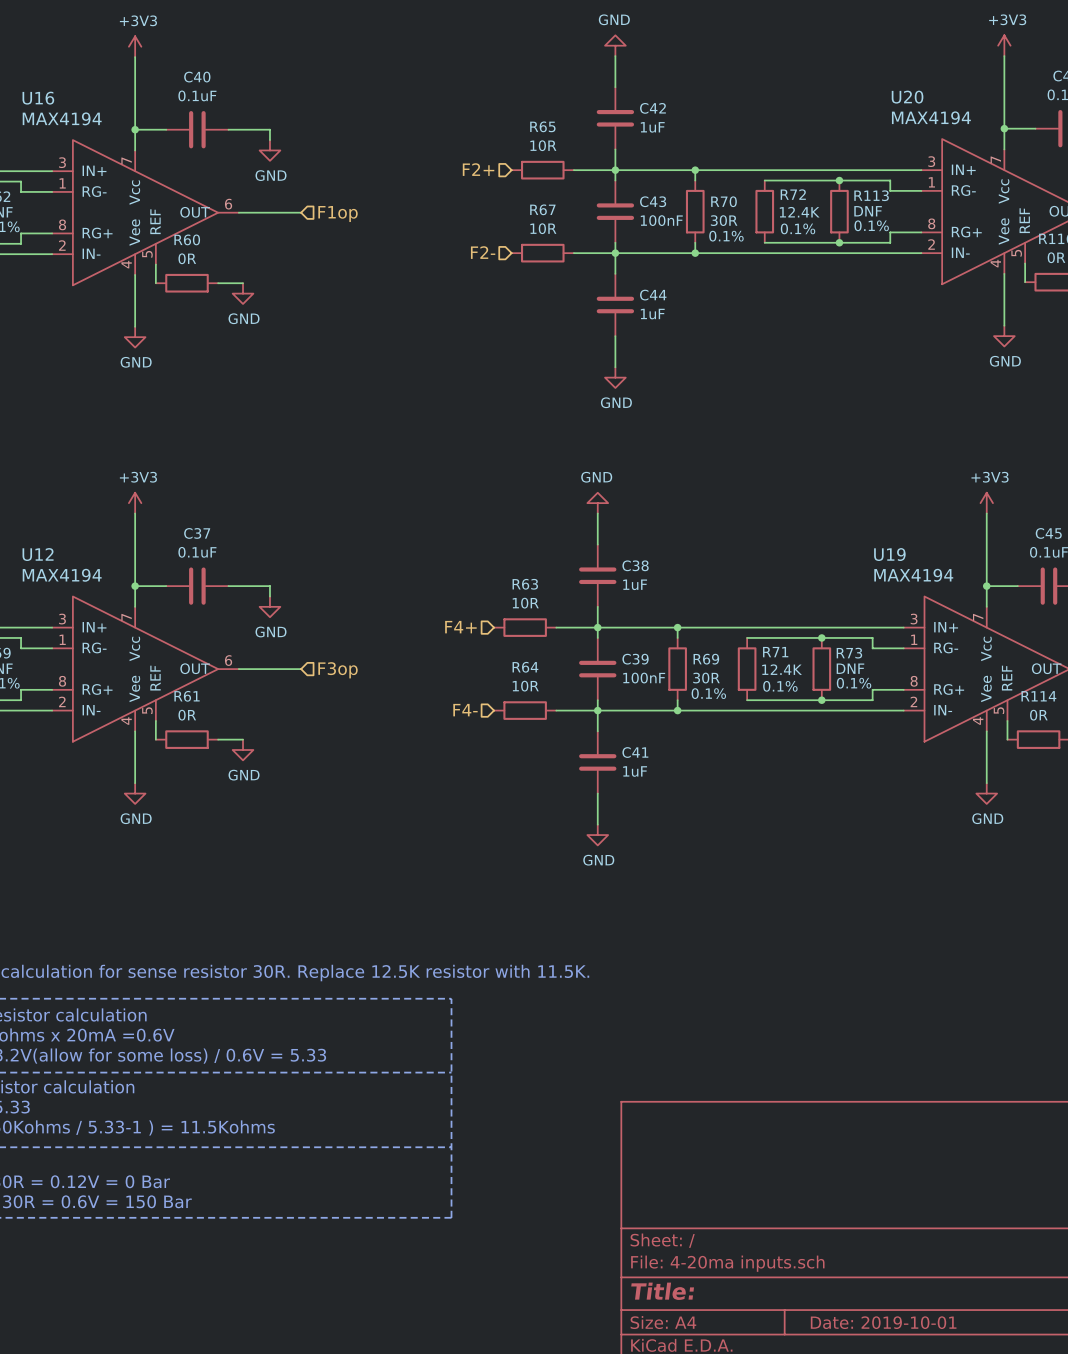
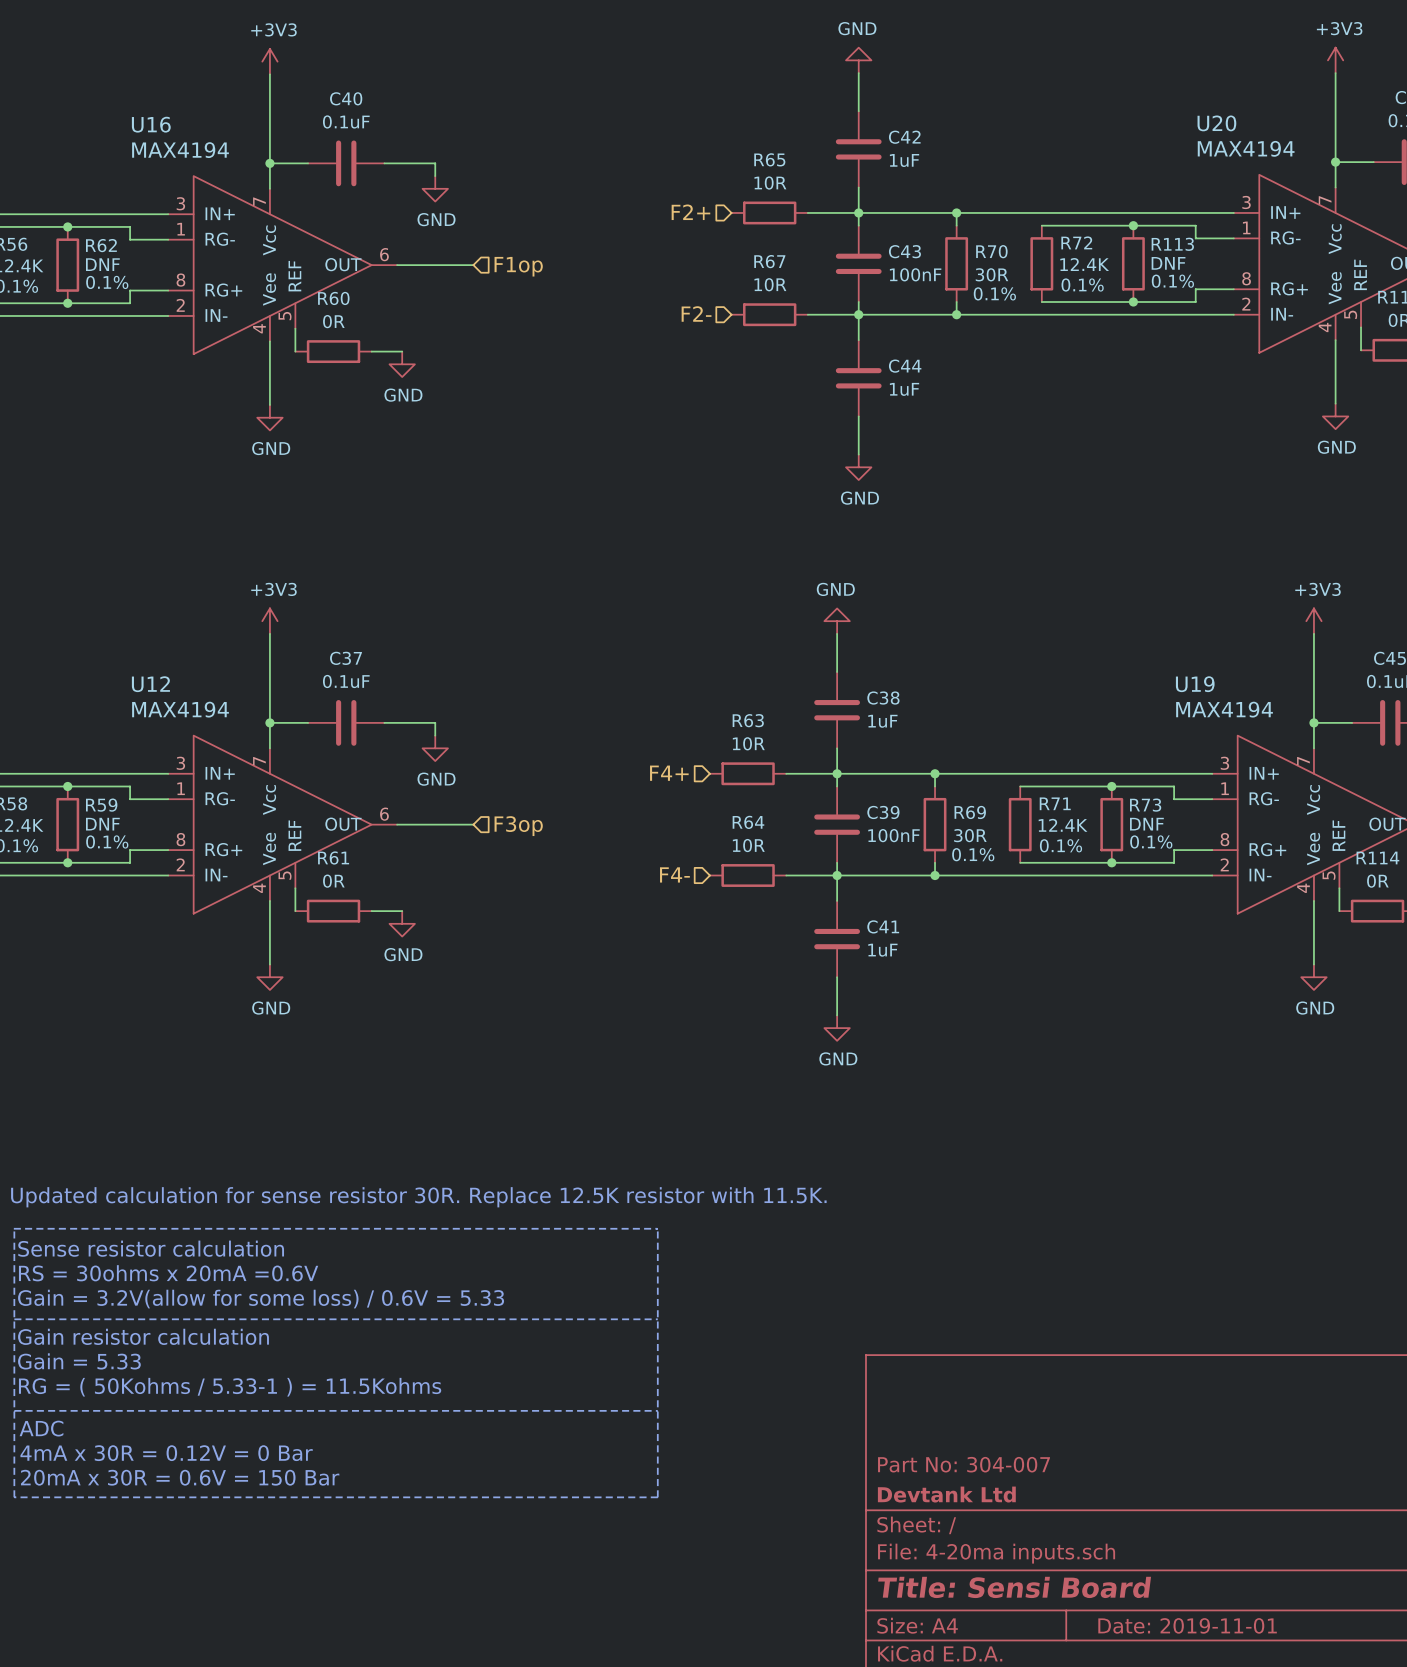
title block: none -> Part No: 304-007 (964, 1464)
title block: none -> Devtank Ltd (946, 1494)
title block: Title: (662, 1291) -> Title: Sensi Board (1014, 1587)
title block: Date: 2019-10-01 (883, 1322) -> Date: 2019-11-01 (1187, 1625)

